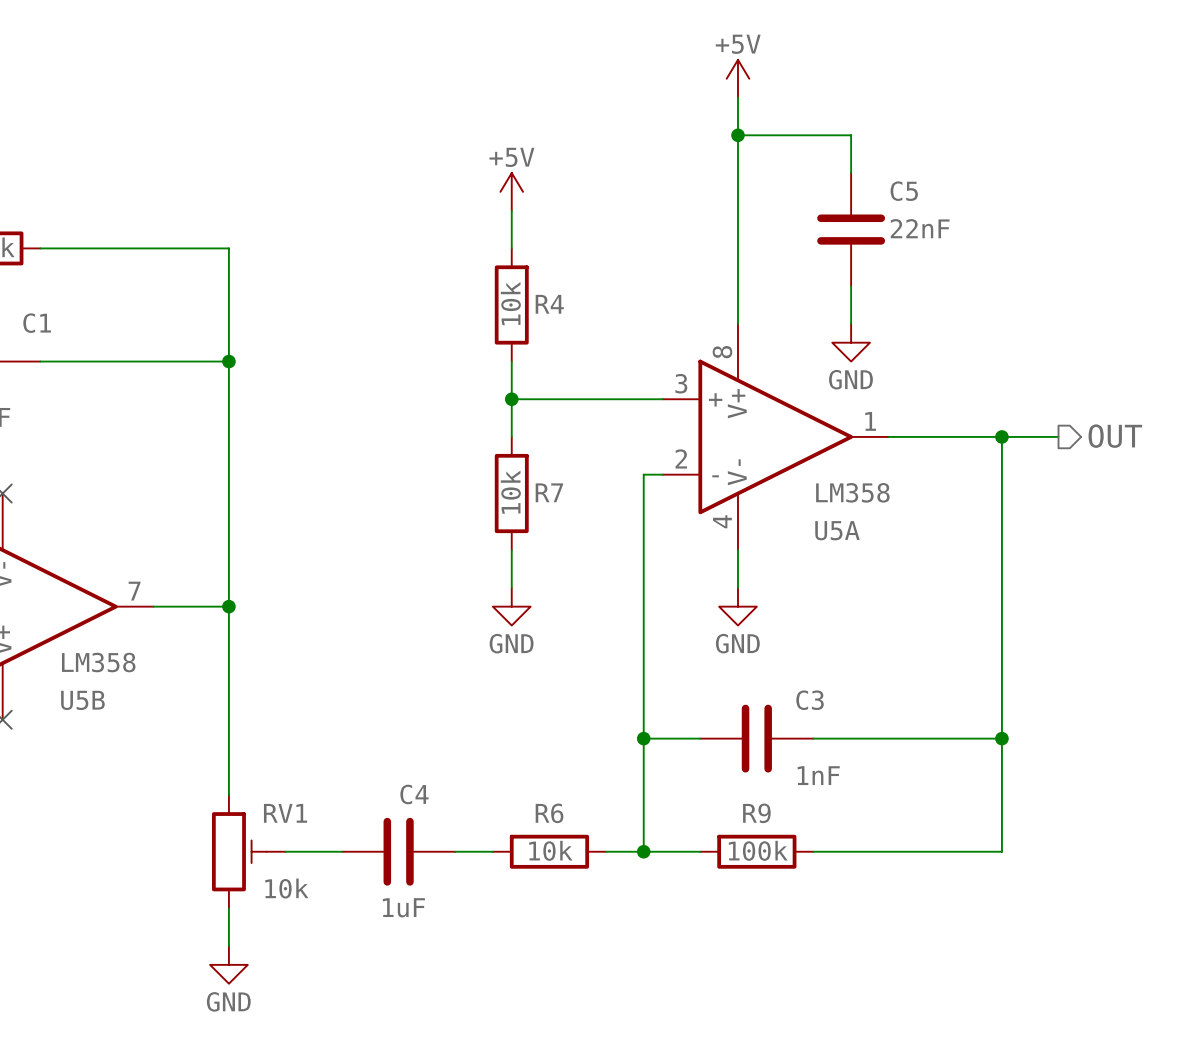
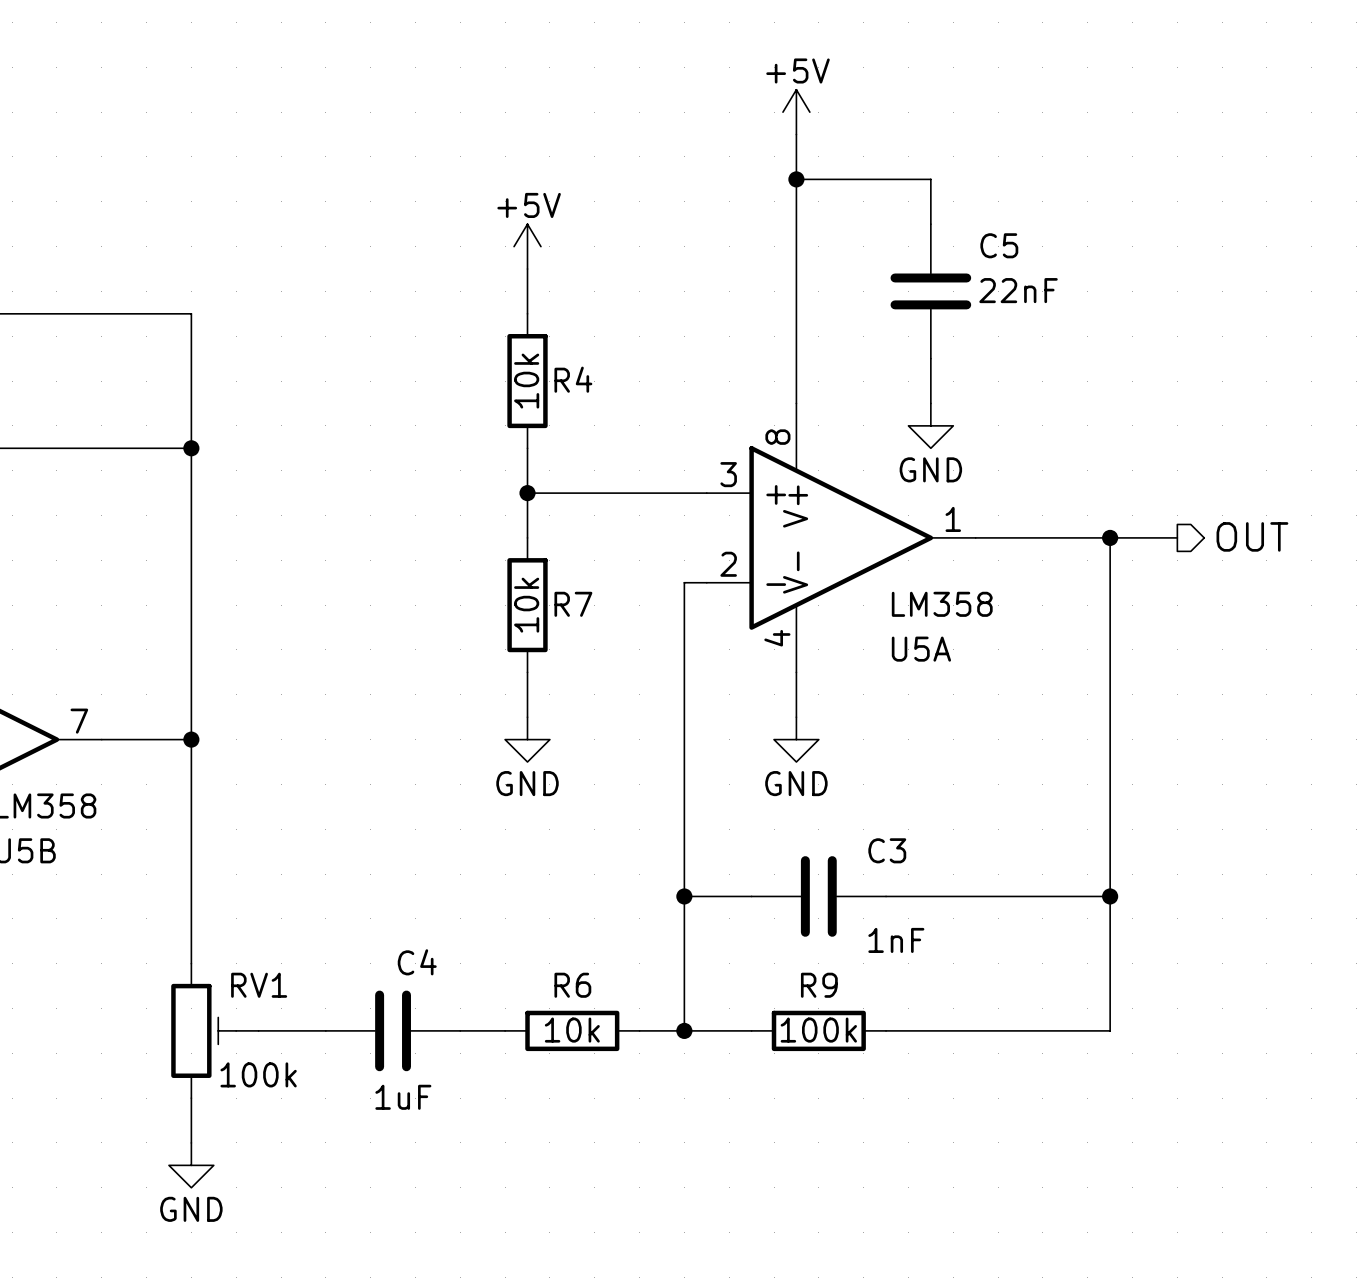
RV1 value: 10k (286, 888) -> 100k (258, 1074)

